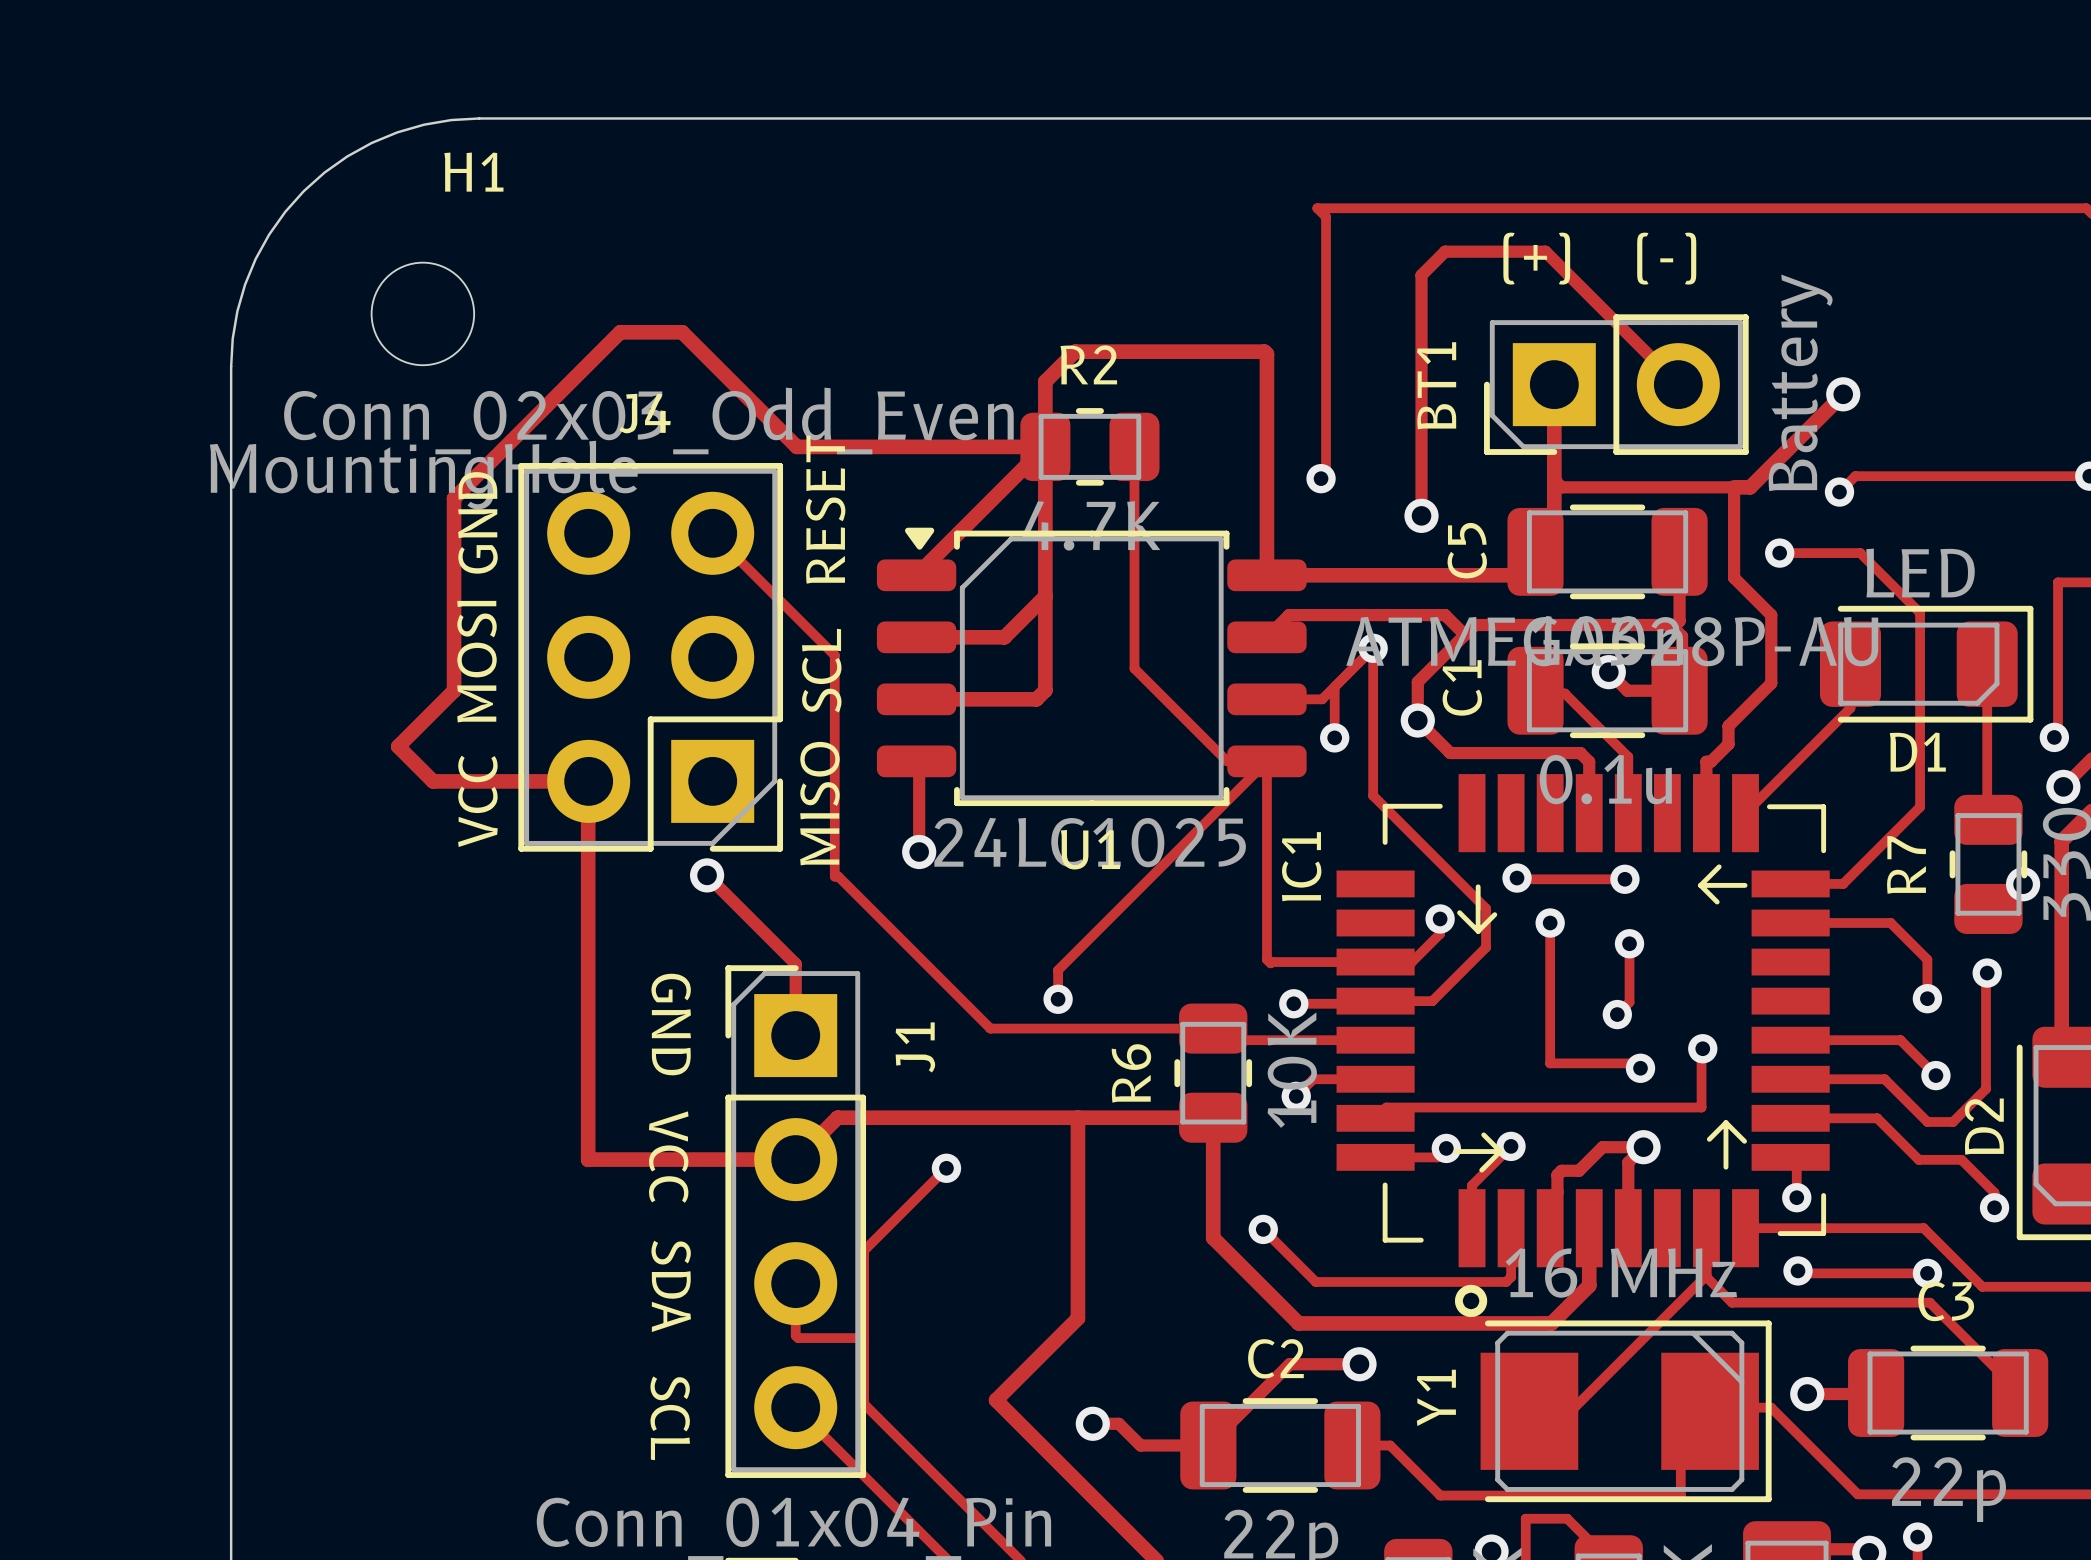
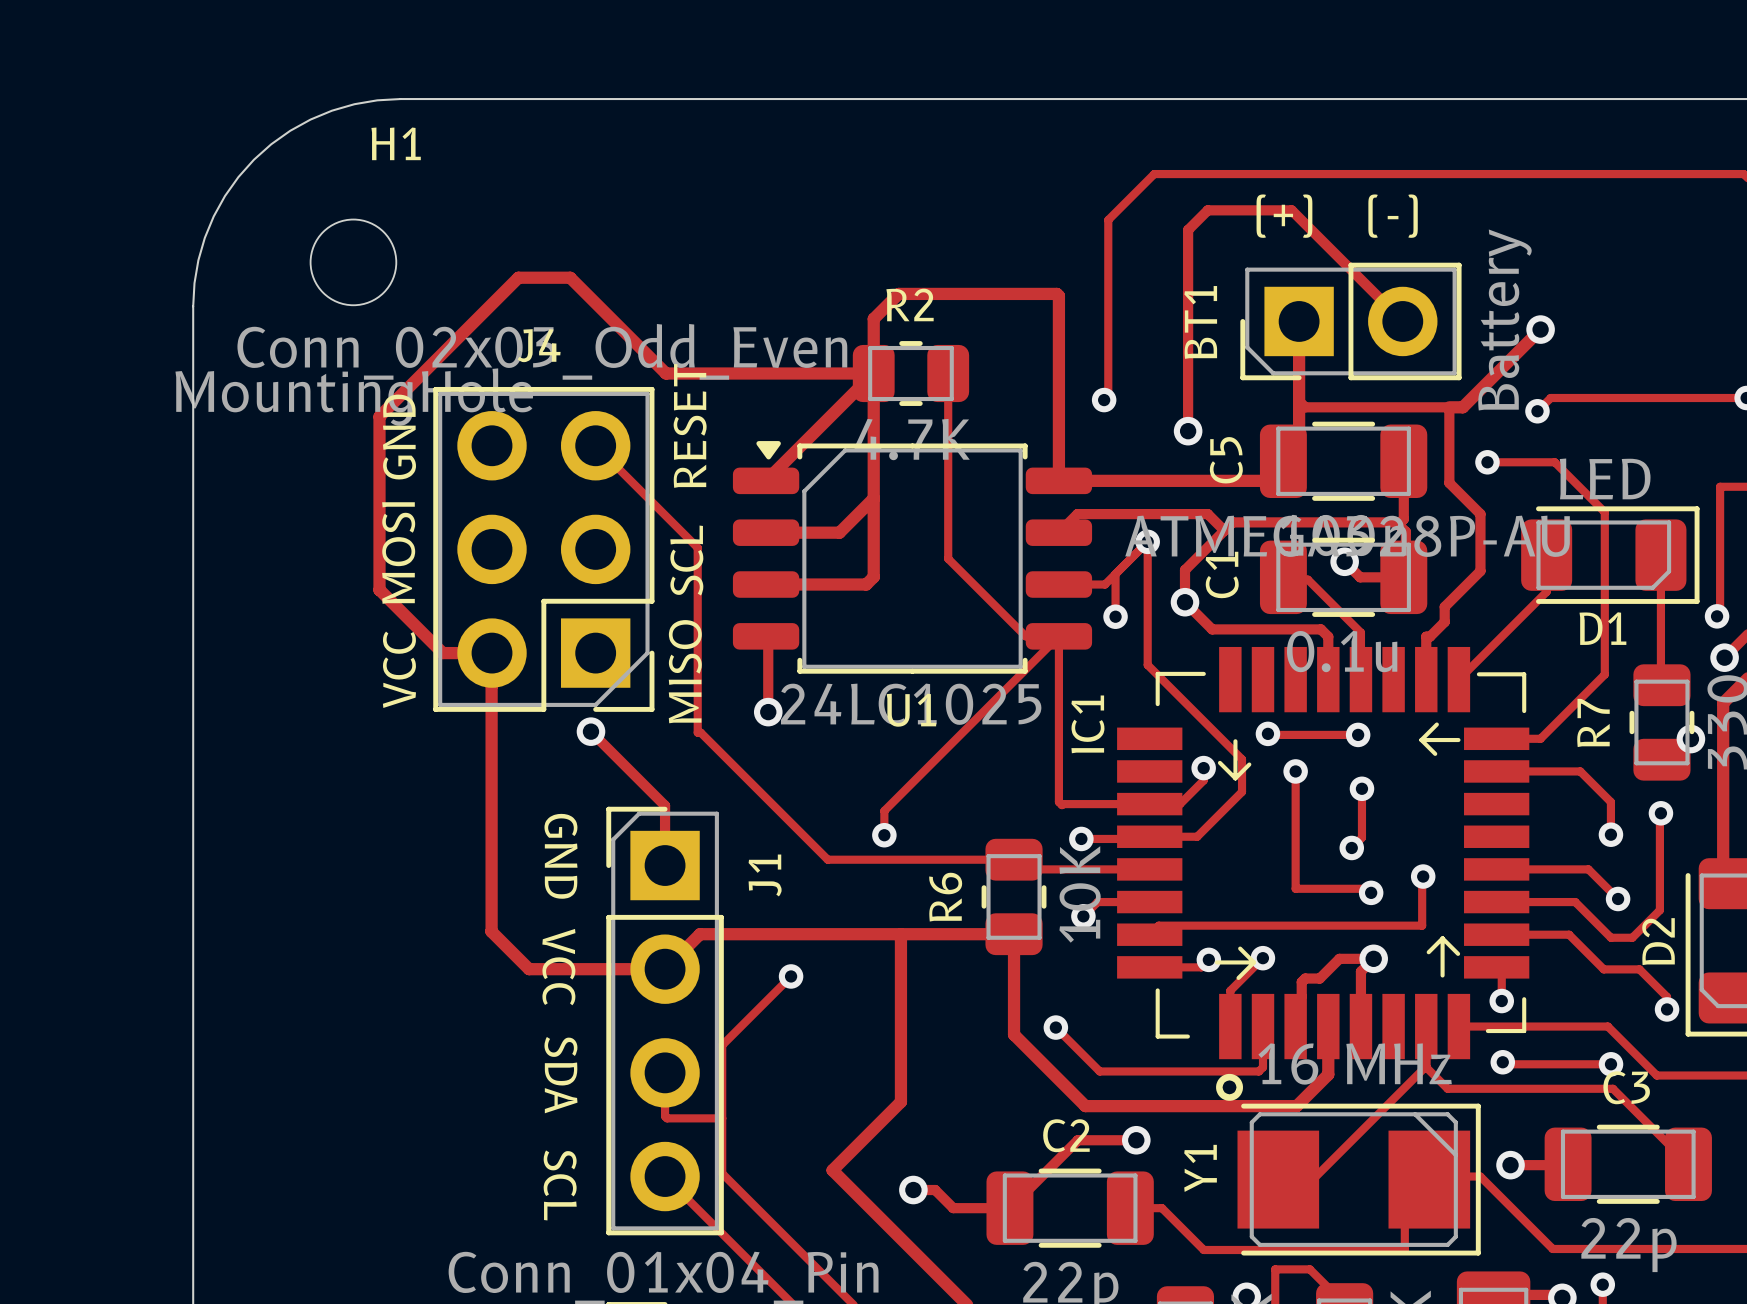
track: (1381, 208) (1317, 208) (1326, 216) (1326, 263) -> (1154, 174) (1108, 220)
track: (454, 690) (398, 746) (433, 781) (529, 781) -> (379, 577) (379, 590) (442, 653)
track: (588, 1114) (588, 1159) -> none
track: (588, 1159) (633, 1159) -> (491, 931) (529, 969)

